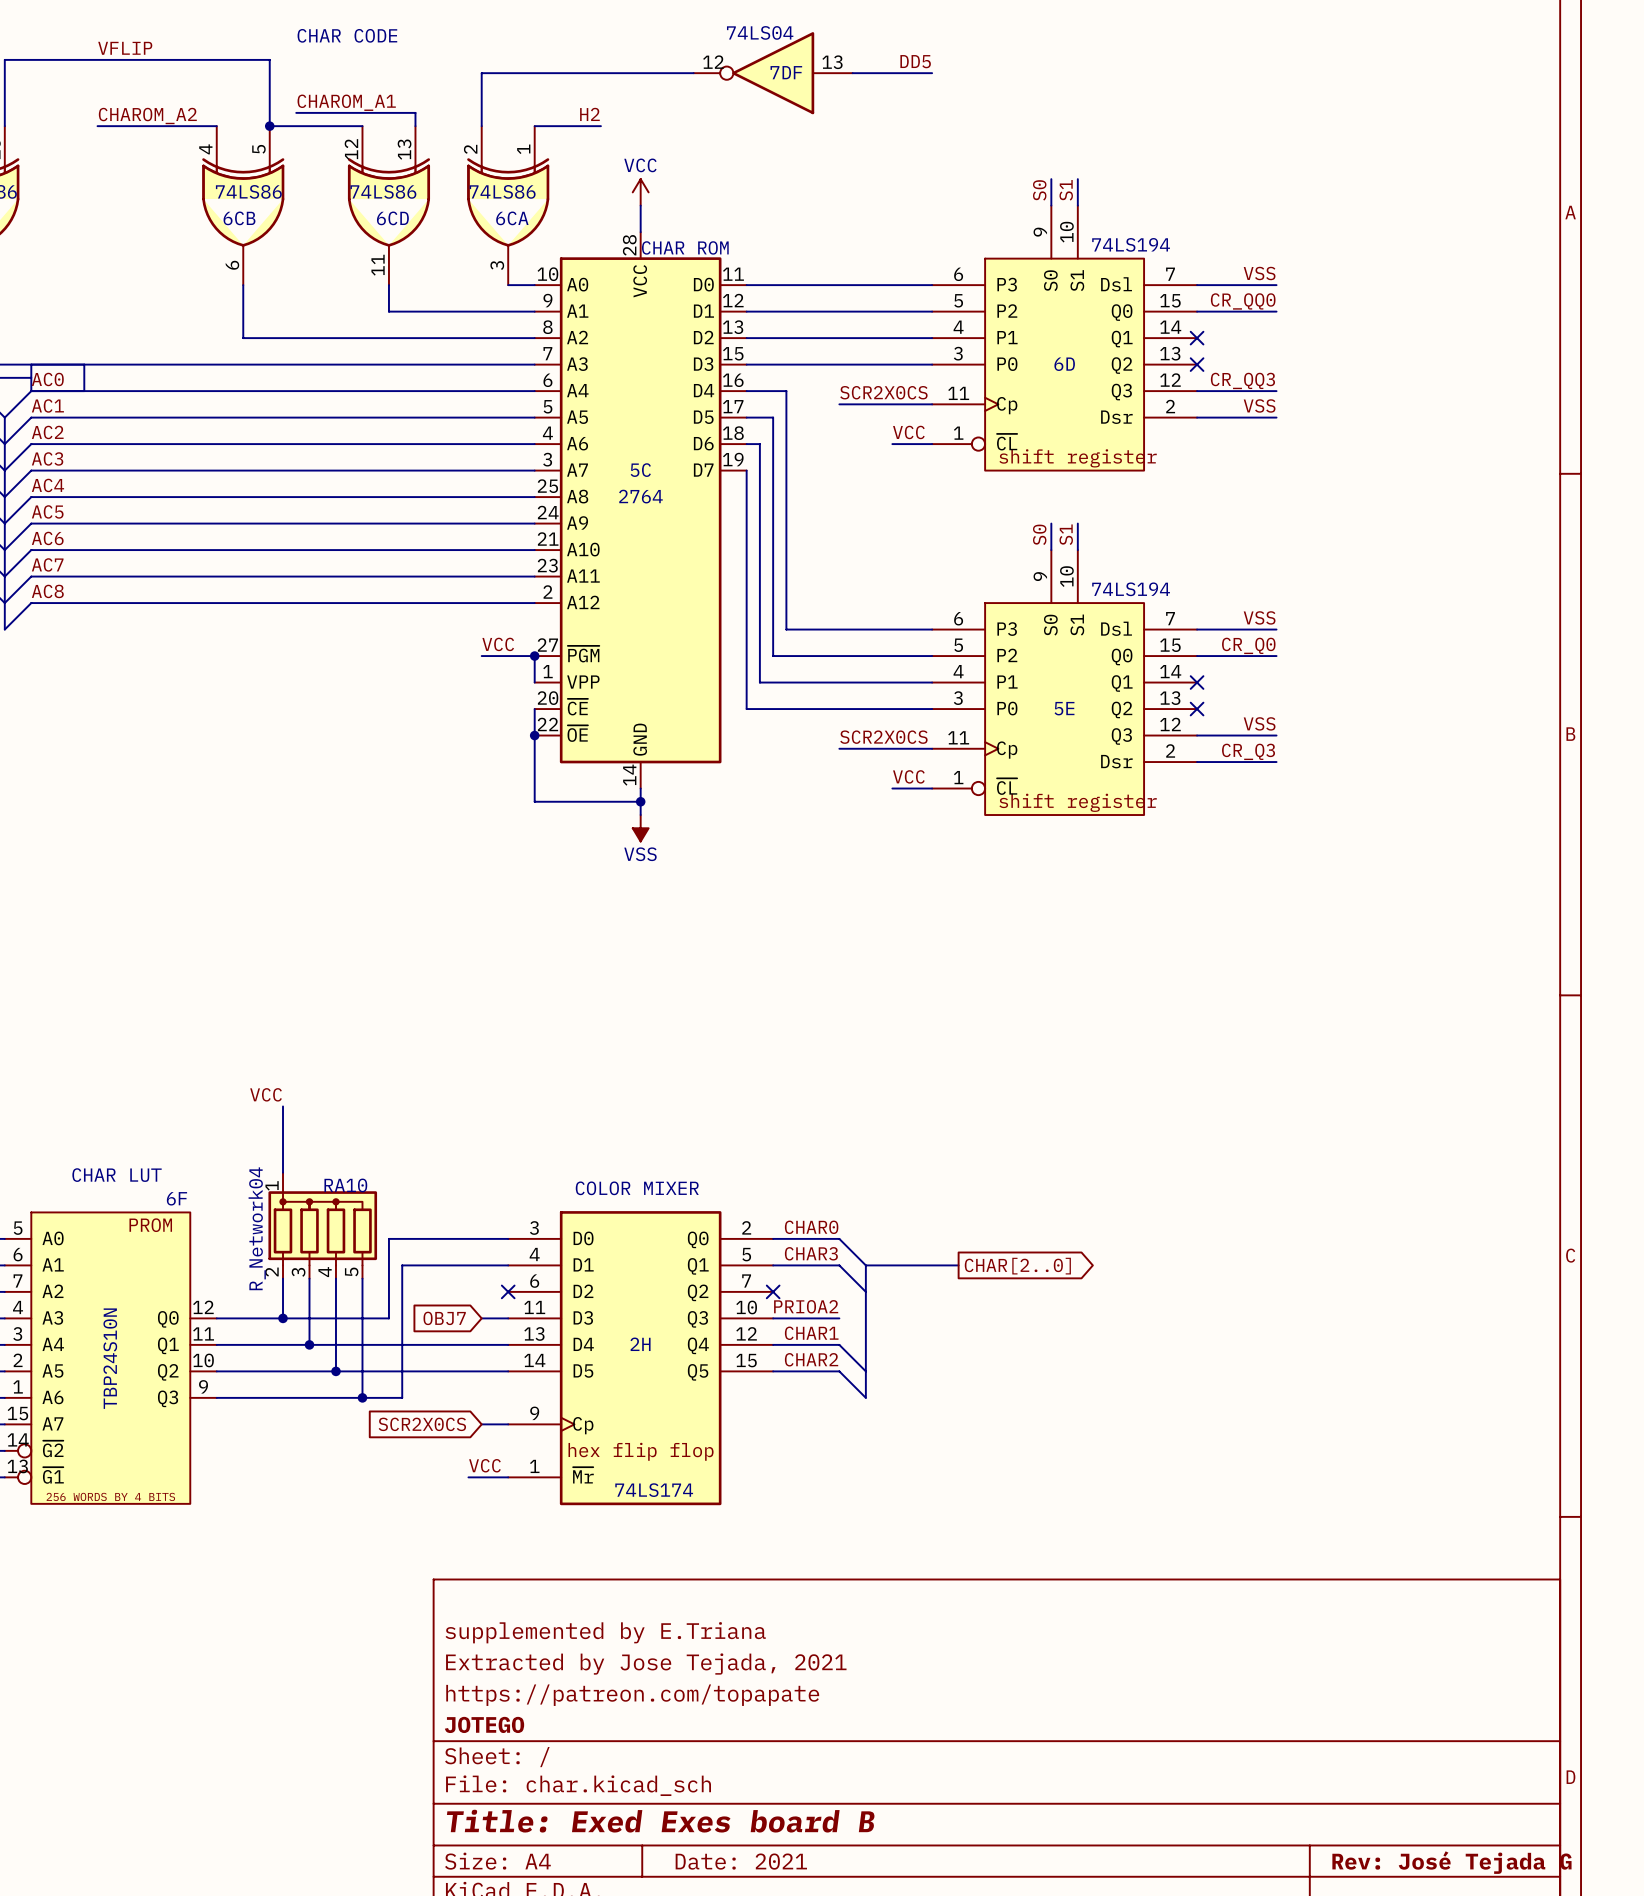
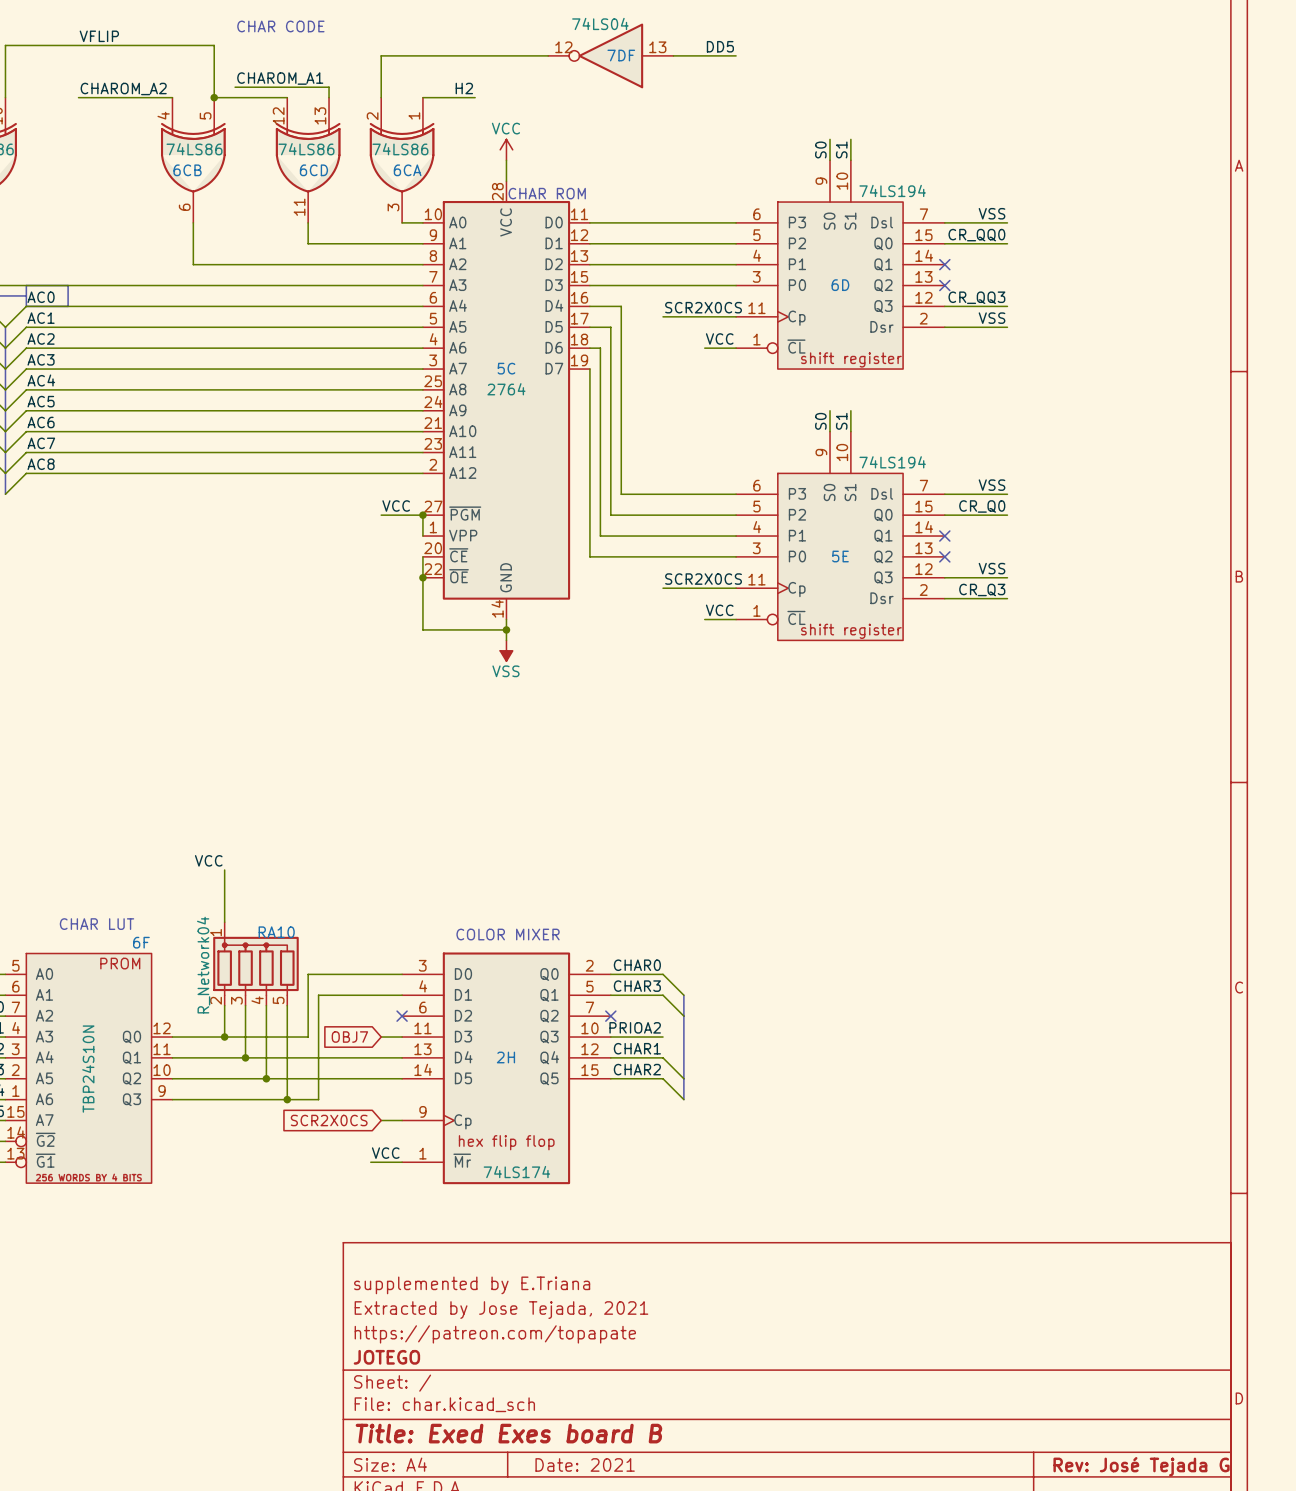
bus: (865, 1265) (958, 1265) -> none
global label: CHAR[2..0] (1017, 1266) -> none

